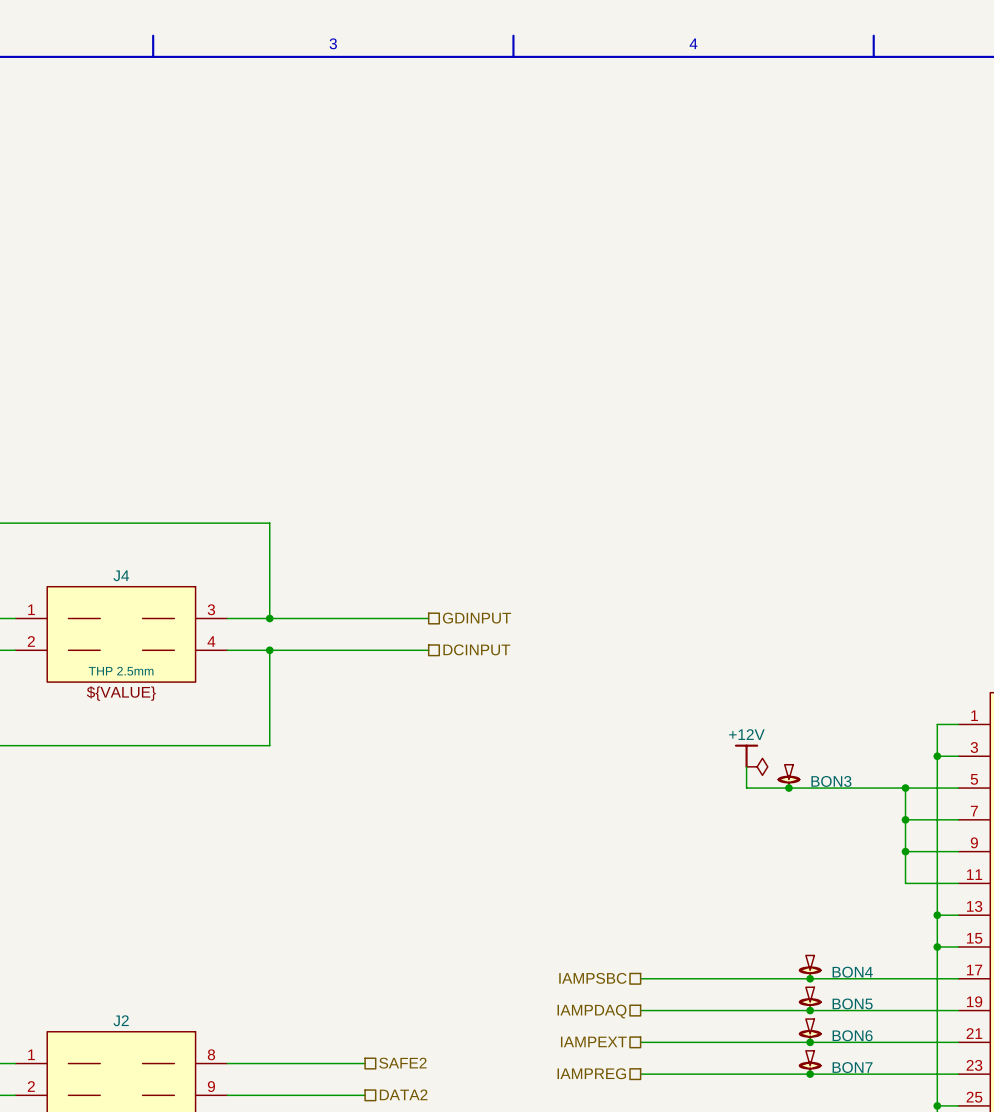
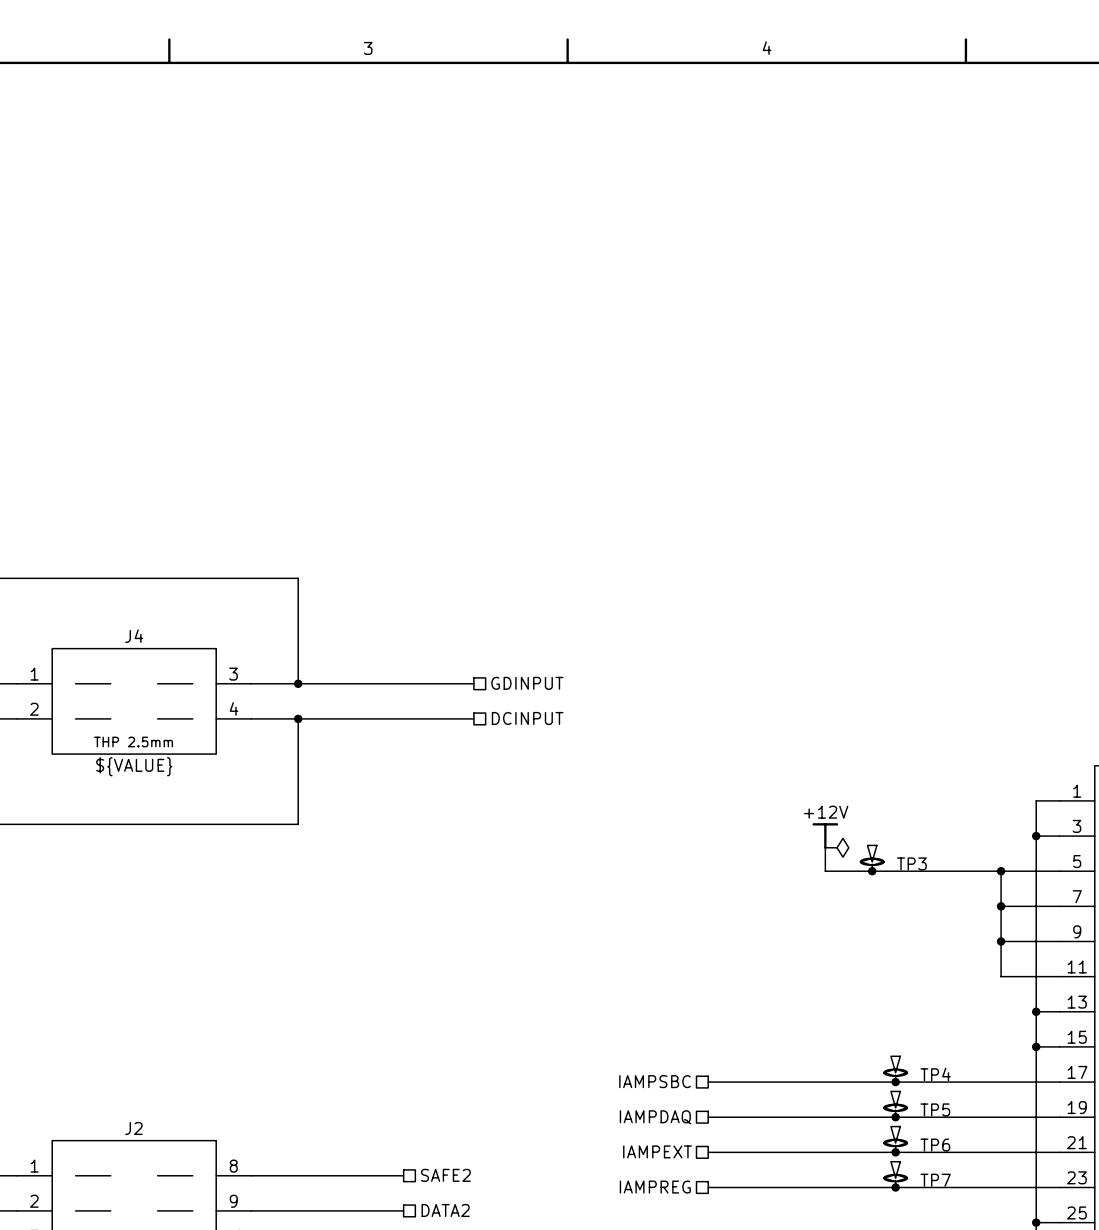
BON3 name: BON3 (831, 781) -> TP3 (911, 863)
BON4 name: BON4 (852, 972) -> TP4 (935, 1074)
BON5 name: BON5 (852, 1003) -> TP5 (935, 1109)
BON6 name: BON6 (852, 1035) -> TP6 (935, 1145)
BON7 name: BON7 (852, 1067) -> TP7 (935, 1180)

